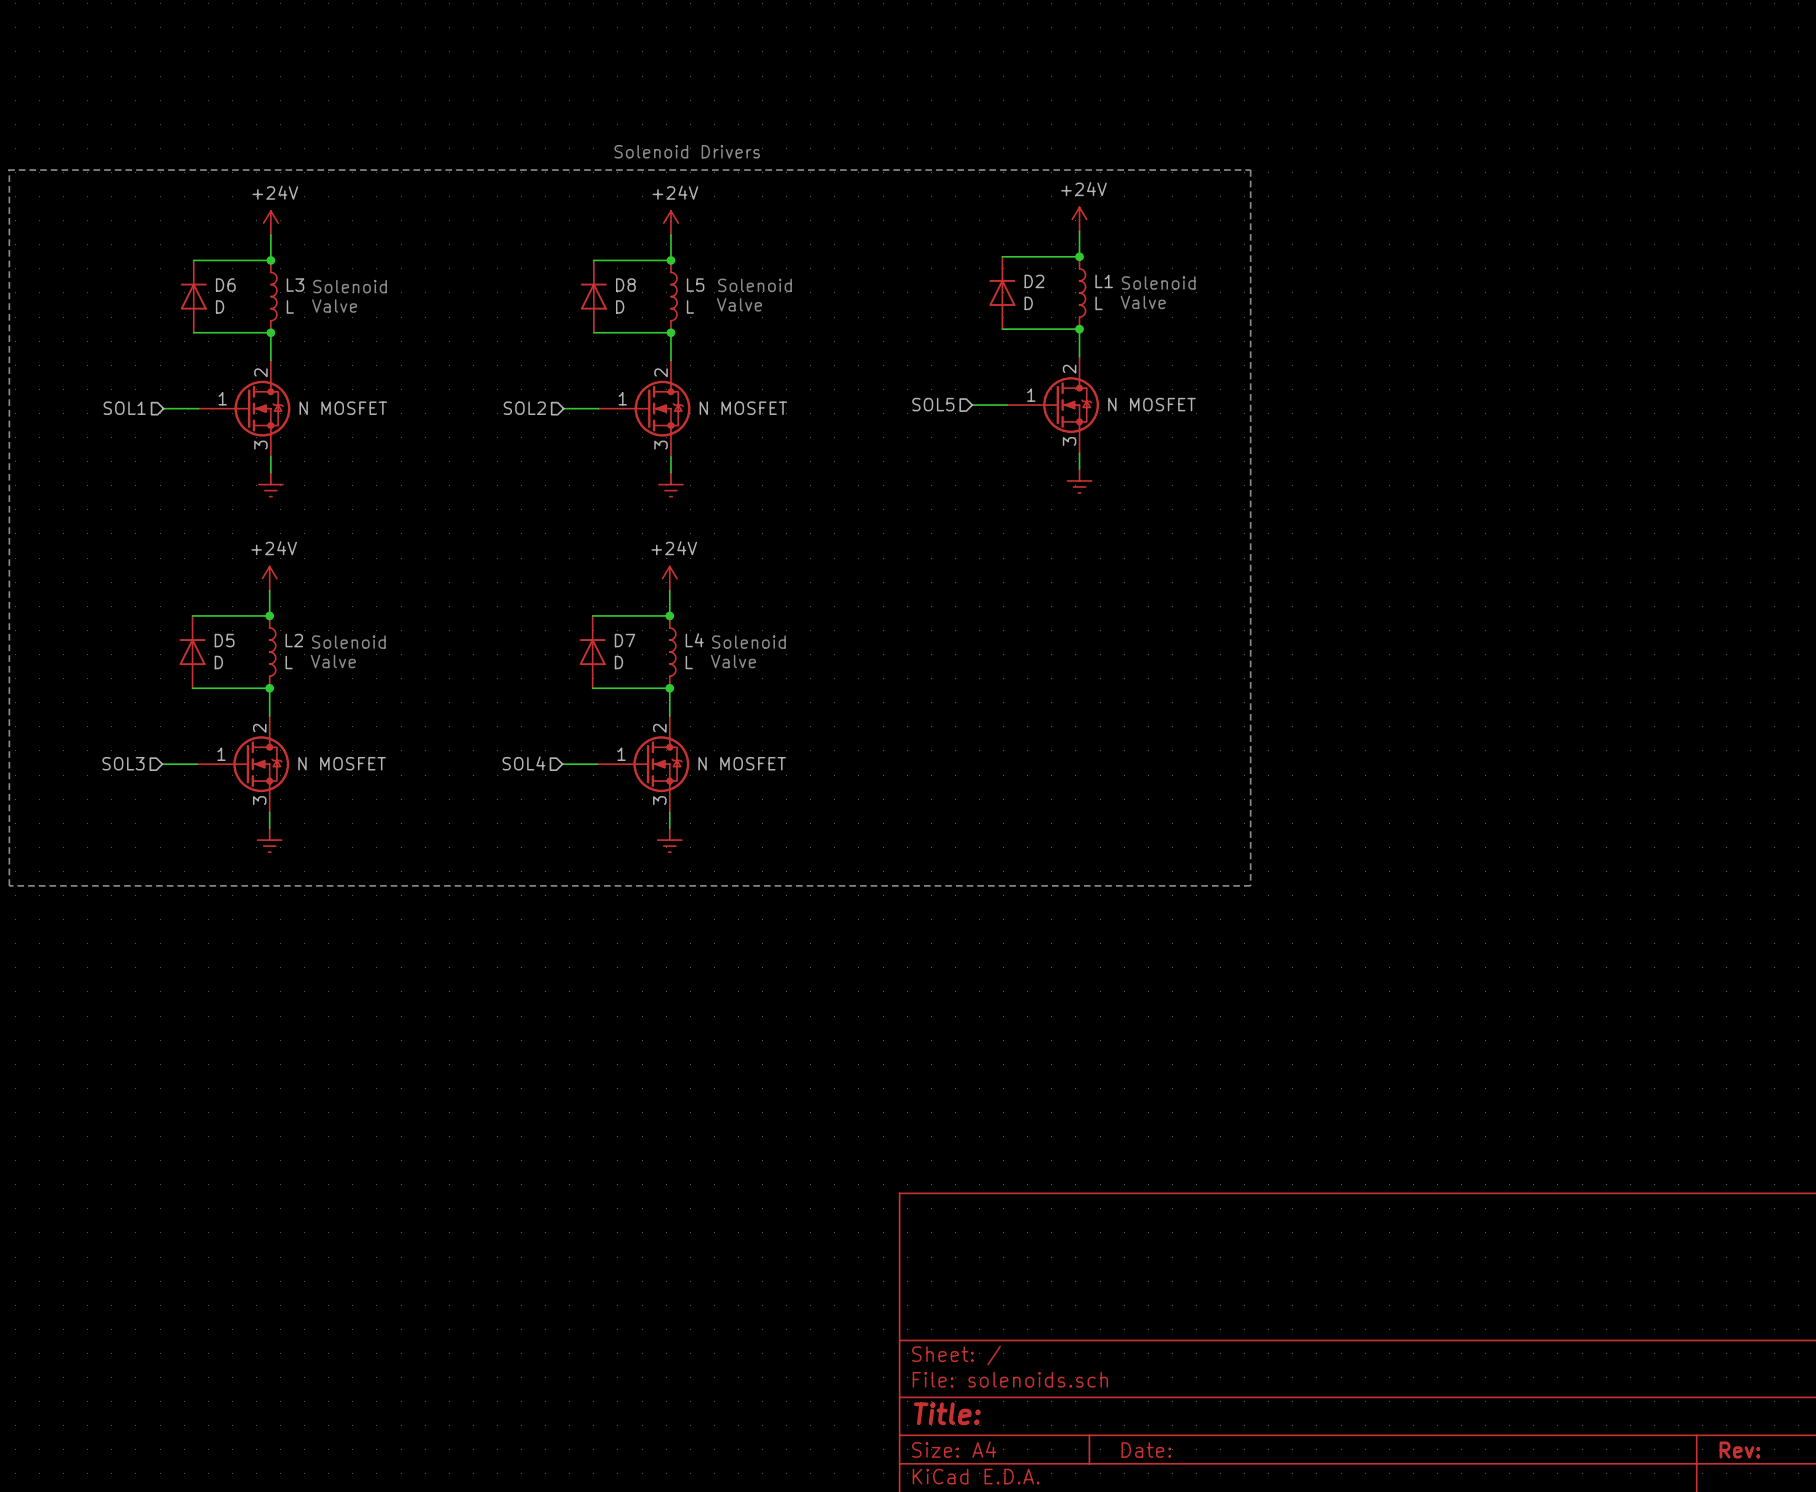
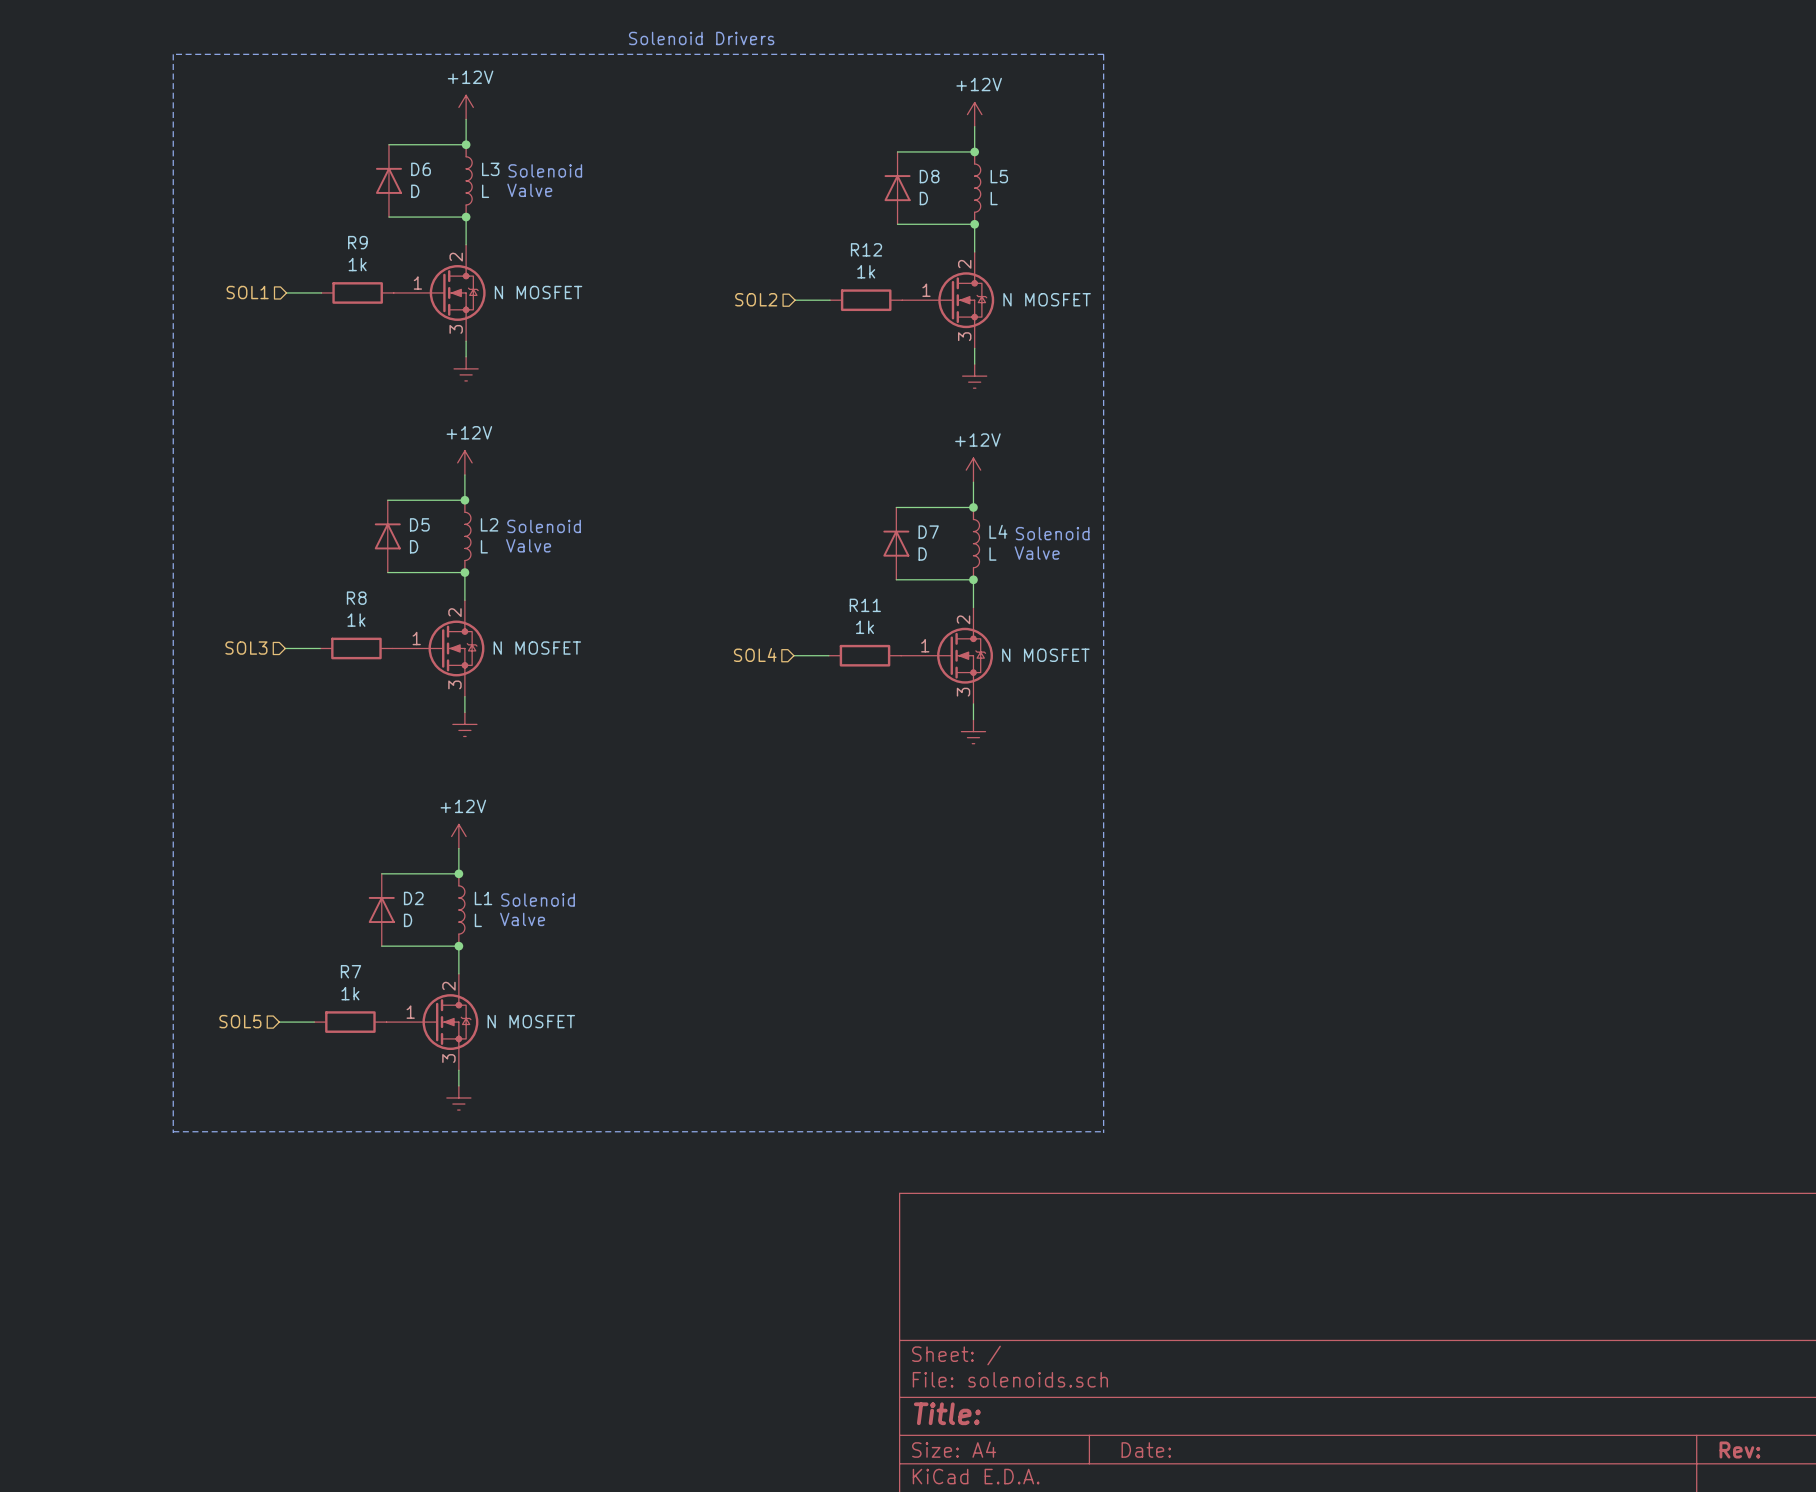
power symbol: none -> +12V (466, 107)
power symbol: none -> +12V (974, 114)
junction: none -> (466, 144)
text position: Solenoid Drivers (687, 151) -> Solenoid Drivers (701, 38)
junction: none -> (974, 151)
line: (8, 170) (1250, 170) (1250, 885) (9, 885) (9, 170) -> none
text: none -> Solenoid (545, 170)
text: none -> Valve (529, 190)
junction: none -> (466, 217)
power symbol: +24V (1079, 219) -> none
power symbol: +24V (270, 223) -> none
power symbol: +24V (670, 223) -> none
junction: none -> (974, 224)
wire: (1079, 231) (1079, 256) (1002, 256) -> (974, 126) (974, 151) (897, 151)
wire: (270, 235) (270, 260) (193, 260) -> (466, 119) (466, 144) (388, 144)
wire: (670, 235) (670, 260) (593, 260) -> none
junction: (1079, 256) -> none
junction: (270, 260) -> none
junction: (670, 260) -> none
text: Solenoid (1158, 282) -> none
text: Solenoid (754, 285) -> none
text: Solenoid (350, 286) -> none
R9: none -> 1k (357, 292)
part: none -> N MOSFET (439, 292)
D2 position: (1002, 292) -> (381, 909)
L1 position: (1082, 292) -> (461, 909)
D6 position: (193, 296) -> (388, 180)
L3 position: (273, 296) -> (469, 180)
D8 position: (593, 296) -> (897, 188)
L5 position: (673, 296) -> (977, 188)
hierarchical label: none -> SOL2 (756, 299)
R12: none -> 1k (866, 300)
part: none -> N MOSFET (948, 300)
text: Valve (1143, 302) -> none
text: Valve (739, 304) -> none
text: Valve (334, 305) -> none
wire: (1002, 329) (1079, 329) (1079, 356) -> (897, 224) (974, 224) (974, 251)
junction: (1079, 329) -> none
wire: (193, 332) (270, 332) (270, 360) -> (388, 217) (466, 217) (466, 244)
junction: (270, 332) -> none
wire: (593, 332) (670, 332) (670, 360) -> none
junction: (670, 332) -> none
power symbol: none -> (466, 368)
power symbol: none -> (974, 376)
hierarchical label: SOL5 (933, 404) -> none
wire: (972, 405) (1007, 405) -> (795, 300) (830, 300)
part: N MOSFET (1053, 405) -> none
hierarchical label position: SOL1 (124, 408) -> SOL1 (247, 292)
wire: (163, 408) (198, 408) -> (286, 292) (321, 292)
part: N MOSFET (244, 408) -> none
hierarchical label: SOL2 (524, 408) -> none
wire: (563, 408) (598, 408) -> none
part: N MOSFET (644, 408) -> none
wire: (1079, 453) (1079, 468) -> (974, 348) (974, 364)
wire: (270, 456) (270, 472) -> (466, 341) (466, 356)
wire: (670, 456) (670, 472) -> none
power symbol: none -> +12V (464, 462)
power symbol: none -> +12V (973, 470)
power symbol: (1079, 480) -> none
wire: none -> (973, 482) (973, 507) (896, 507)
power symbol: (270, 484) -> none
power symbol: (670, 484) -> none
junction: none -> (464, 500)
junction: none -> (973, 507)
text: none -> Solenoid (544, 526)
text: none -> Solenoid (1052, 533)
text: none -> Valve (528, 545)
text: none -> Valve (1037, 553)
junction: none -> (464, 572)
power symbol: +24V (269, 578) -> none
power symbol: +24V (669, 578) -> none
wire: none -> (896, 579) (973, 579) (973, 607)
junction: none -> (973, 579)
wire: (269, 590) (269, 615) (192, 615) -> (464, 474) (464, 500) (387, 500)
wire: (669, 590) (669, 615) (592, 615) -> none
junction: (269, 615) -> none
junction: (669, 615) -> none
text: Solenoid (348, 642) -> none
text: Solenoid (748, 642) -> none
R8: none -> 1k (356, 648)
part: none -> N MOSFET (438, 648)
D5 position: (192, 652) -> (387, 536)
L2 position: (272, 652) -> (467, 536)
D7 position: (592, 652) -> (896, 543)
L4 position: (672, 652) -> (976, 543)
hierarchical label: none -> SOL4 (755, 654)
wire: none -> (793, 655) (828, 655)
R11: none -> 1k (865, 655)
part: none -> N MOSFET (947, 655)
text: Valve (333, 661) -> none
text: Valve (733, 661) -> none
wire: (192, 688) (269, 688) (269, 715) -> (387, 572) (464, 572) (464, 600)
junction: (269, 688) -> none
wire: (592, 688) (669, 688) (669, 715) -> none
junction: (669, 688) -> none
wire: none -> (973, 703) (973, 719)
power symbol: none -> (464, 724)
power symbol: none -> (973, 731)
hierarchical label position: SOL3 (123, 763) -> SOL3 (246, 648)
hierarchical label: SOL4 (523, 763) -> none
wire: (162, 764) (197, 764) -> (285, 648) (320, 648)
part: N MOSFET (243, 764) -> none
wire: (562, 764) (597, 764) -> none
part: N MOSFET (643, 764) -> none
wire: (269, 812) (269, 828) -> (464, 696) (464, 712)
wire: (669, 812) (669, 828) -> none
power symbol: none -> +12V (458, 836)
power symbol: (269, 840) -> none
power symbol: (669, 840) -> none
wire: none -> (458, 848) (458, 873) (381, 873)
junction: none -> (458, 873)
text: none -> Solenoid (538, 900)
text: none -> Valve (522, 919)
wire: none -> (381, 946) (458, 946) (458, 973)
junction: none -> (458, 946)
hierarchical label: none -> SOL5 (240, 1021)
wire: none -> (279, 1022) (314, 1022)
R7: none -> 1k (350, 1022)
part: none -> N MOSFET (432, 1022)
wire: none -> (458, 1070) (458, 1085)
power symbol: none -> (458, 1097)
line: none -> (173, 1131) (1103, 1131)
line: none -> (173, 1132) (173, 54) (1103, 54) (1103, 1132)

